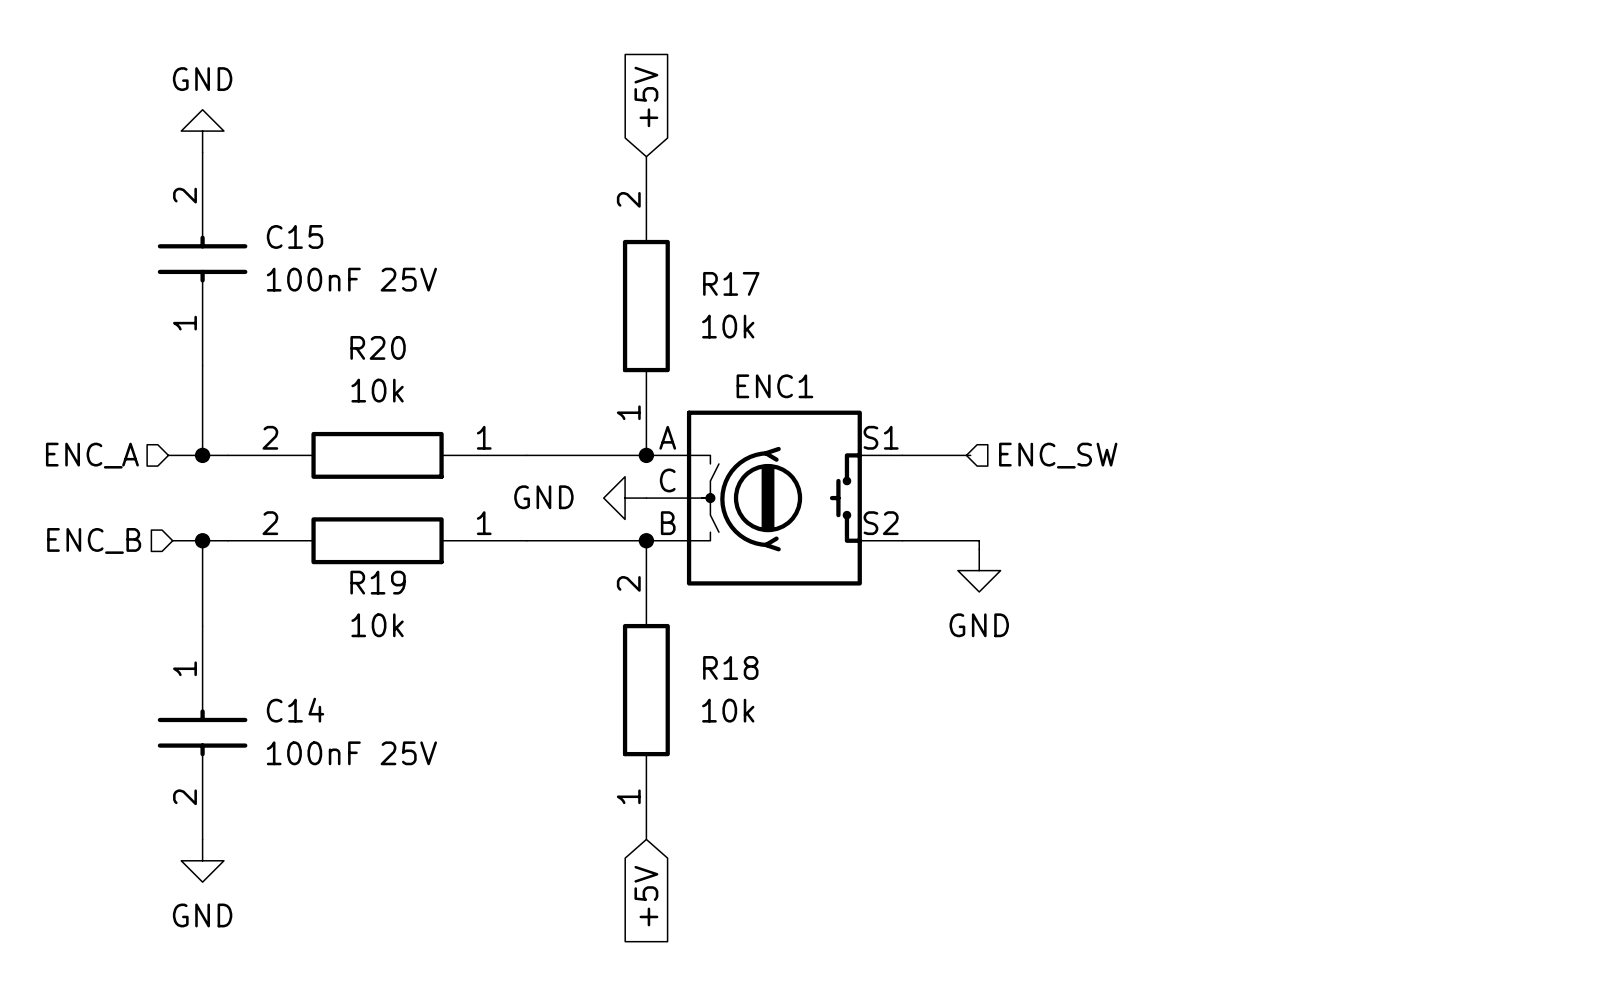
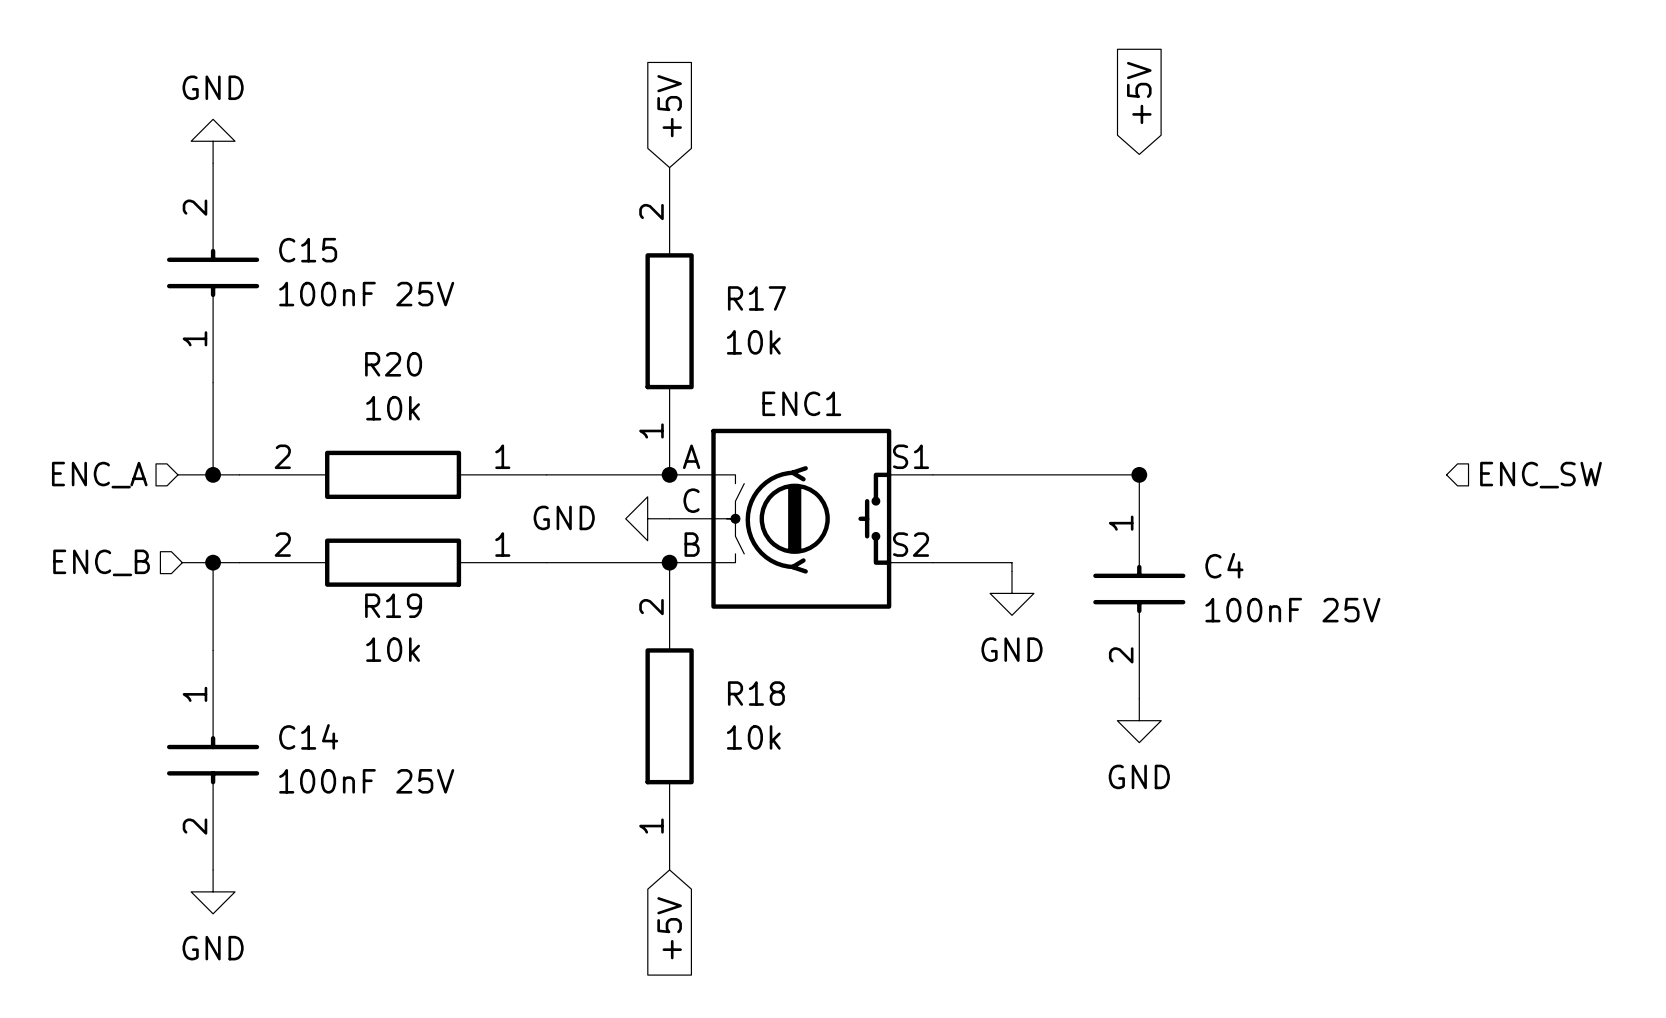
global label: none -> +5V (1139, 92)
wire: none -> (1003, 474) (1139, 474)
hierarchical label: ENC_SW (1058, 455) -> none
junction: none -> (1139, 474)
hierarchical label: none -> ENC_SW (1540, 475)
C4: none -> 100nF 25V (1139, 589)
power symbol: none -> GND (1139, 720)

